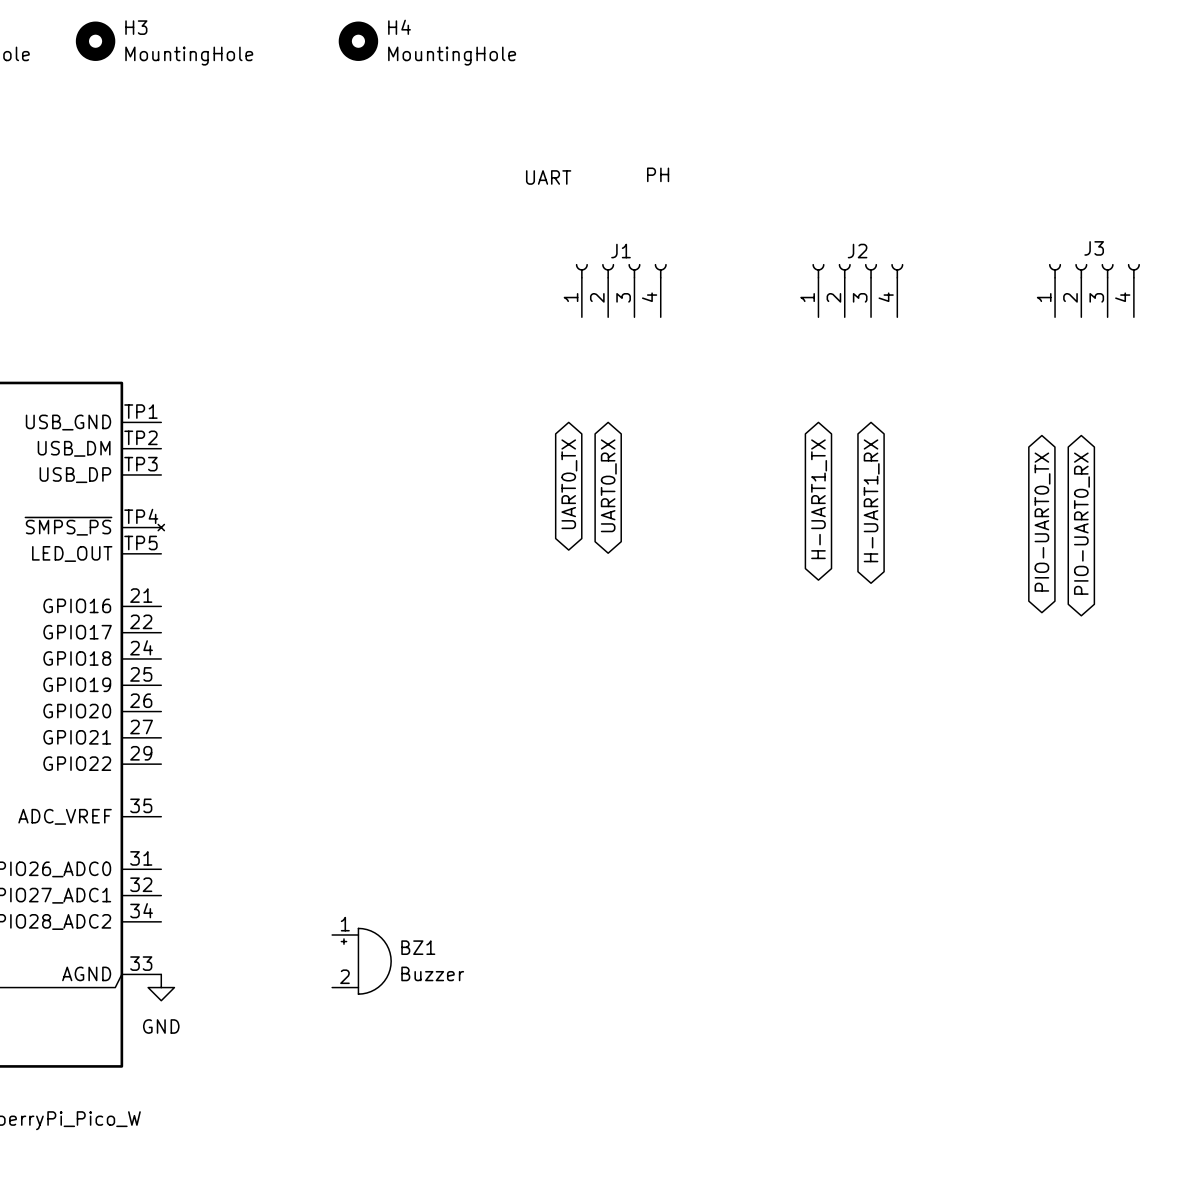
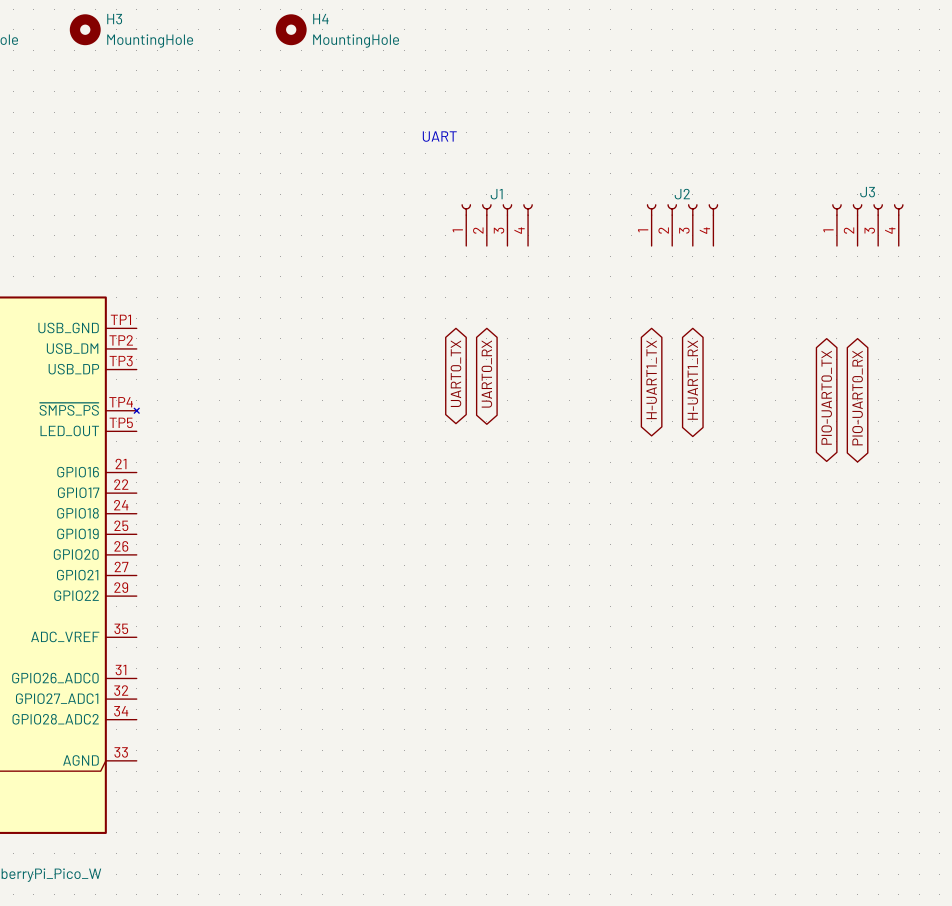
text: PH (658, 174) -> none
BZ1: Buzzer (361, 961) -> none
power symbol: GND (161, 987) -> none

